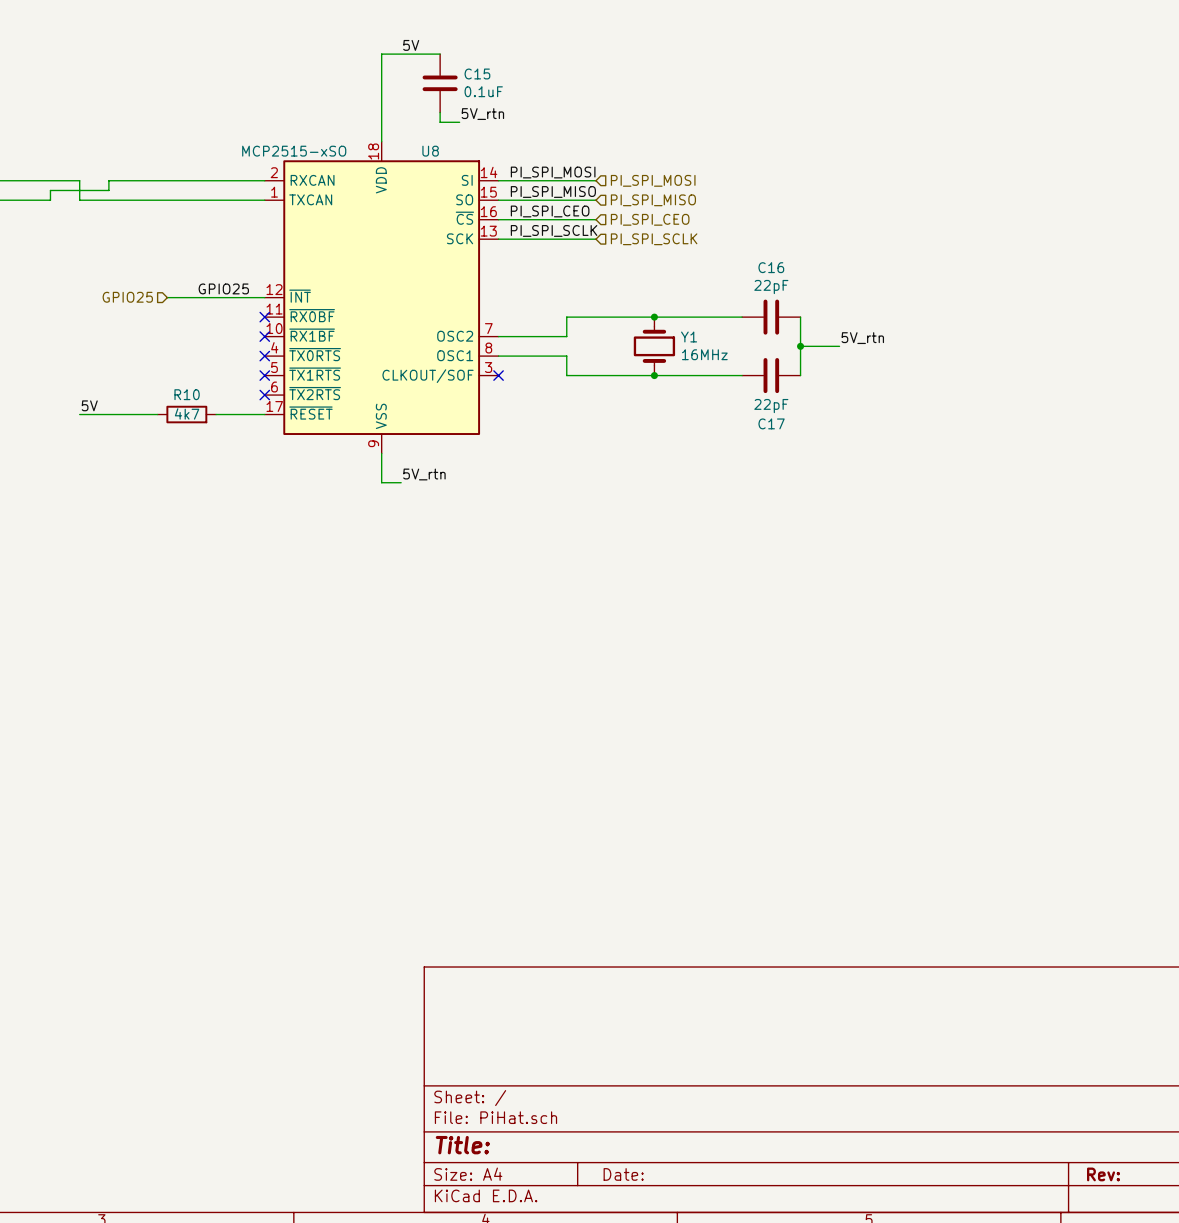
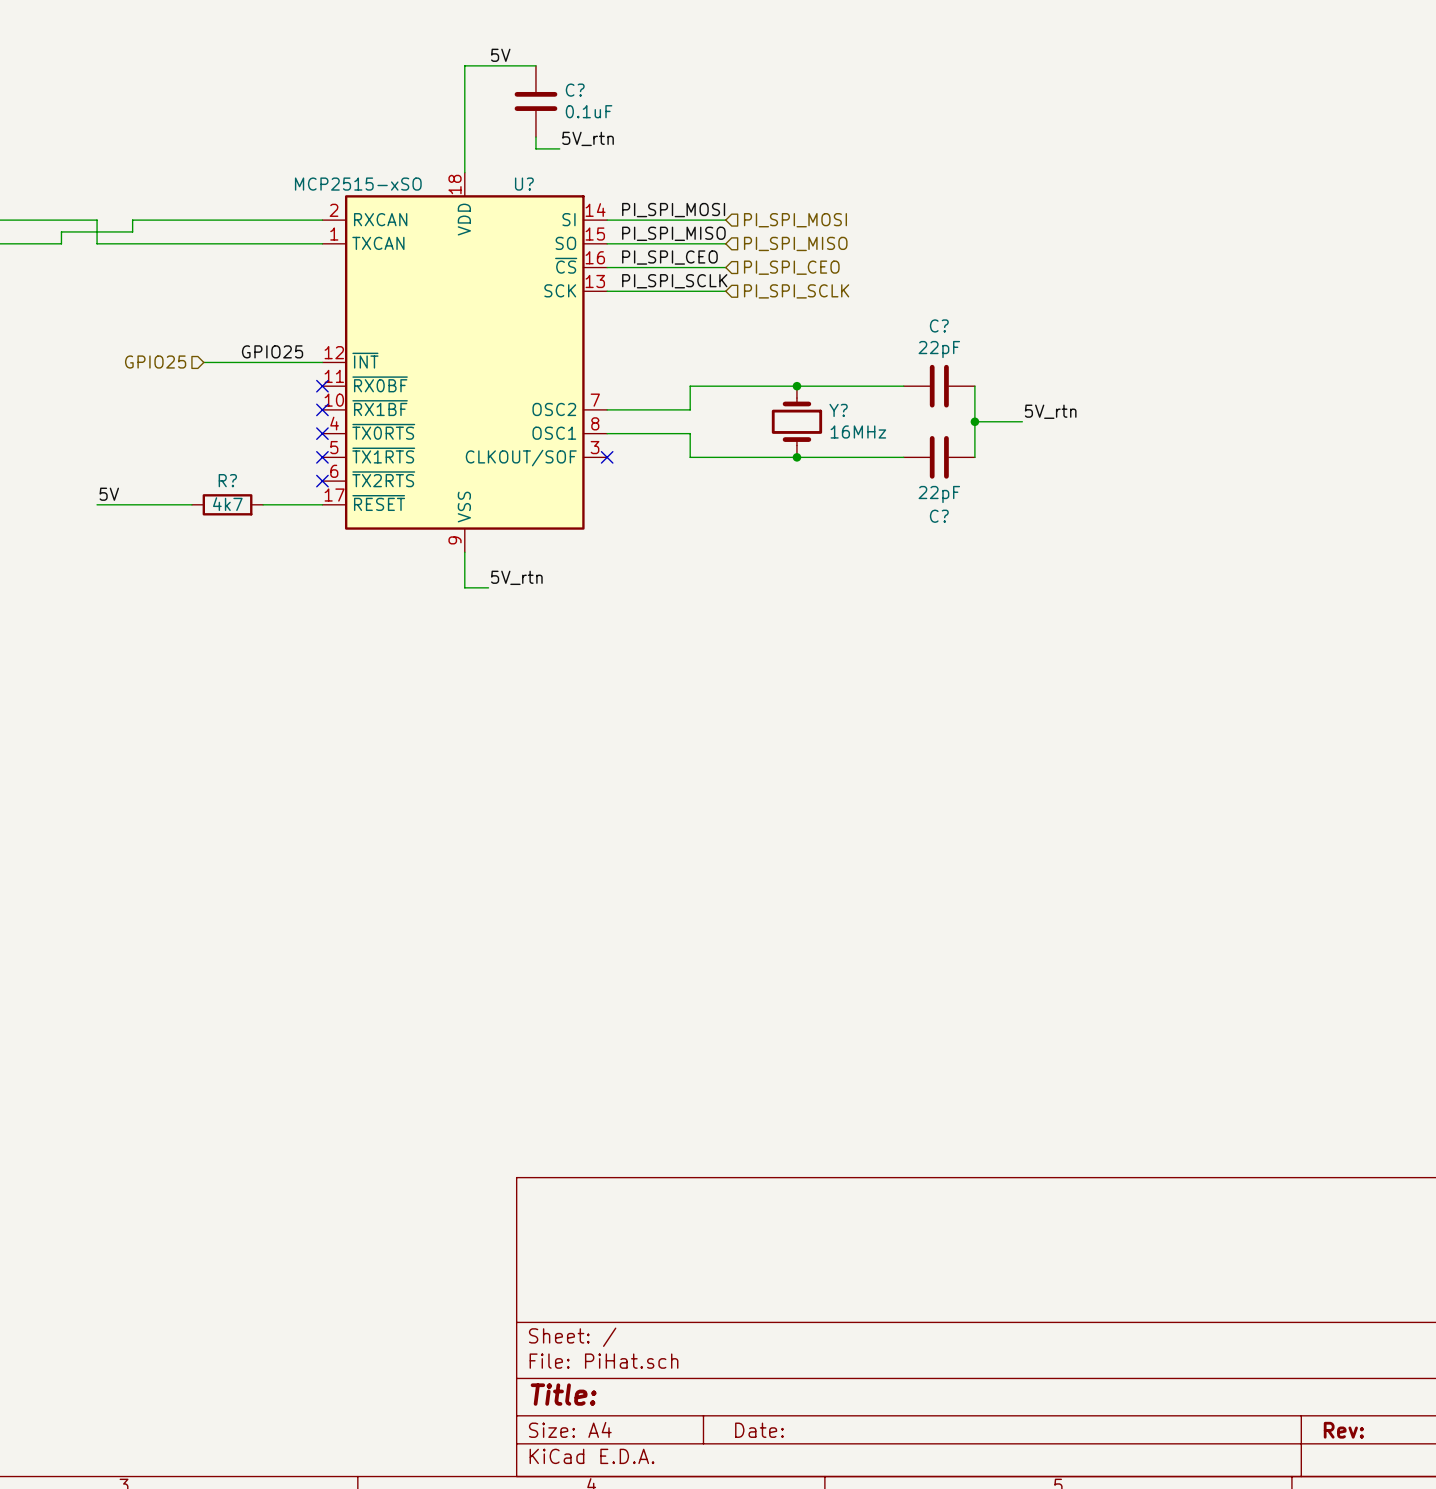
C15 name: C15 (477, 73) -> C? (575, 90)
U8 name: U8 (430, 151) -> U? (524, 184)
C16 name: C16 (771, 267) -> C? (939, 325)
Y1 name: Y1 (689, 337) -> Y? (838, 410)
R10 name: R10 (187, 394) -> R? (227, 480)
C17 name: C17 (771, 423) -> C? (939, 516)

